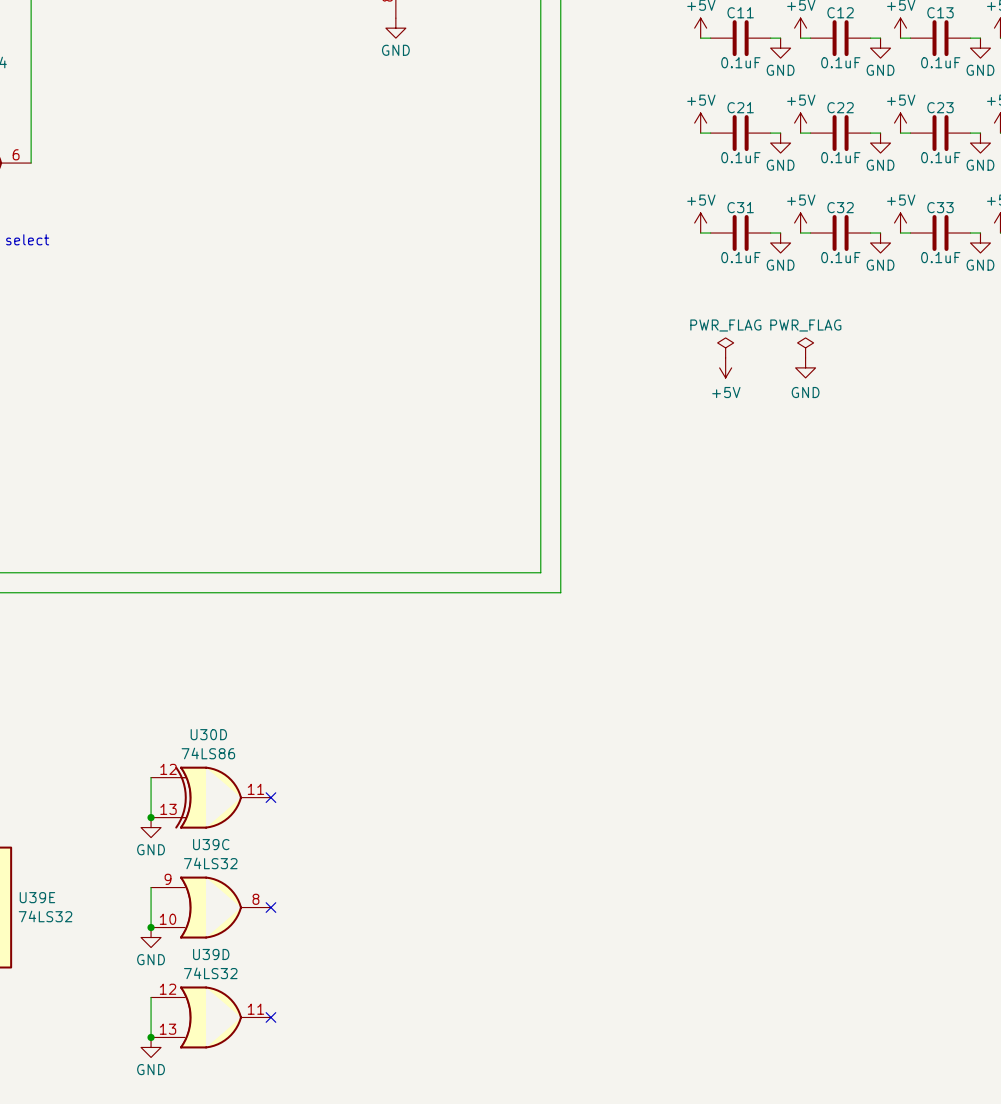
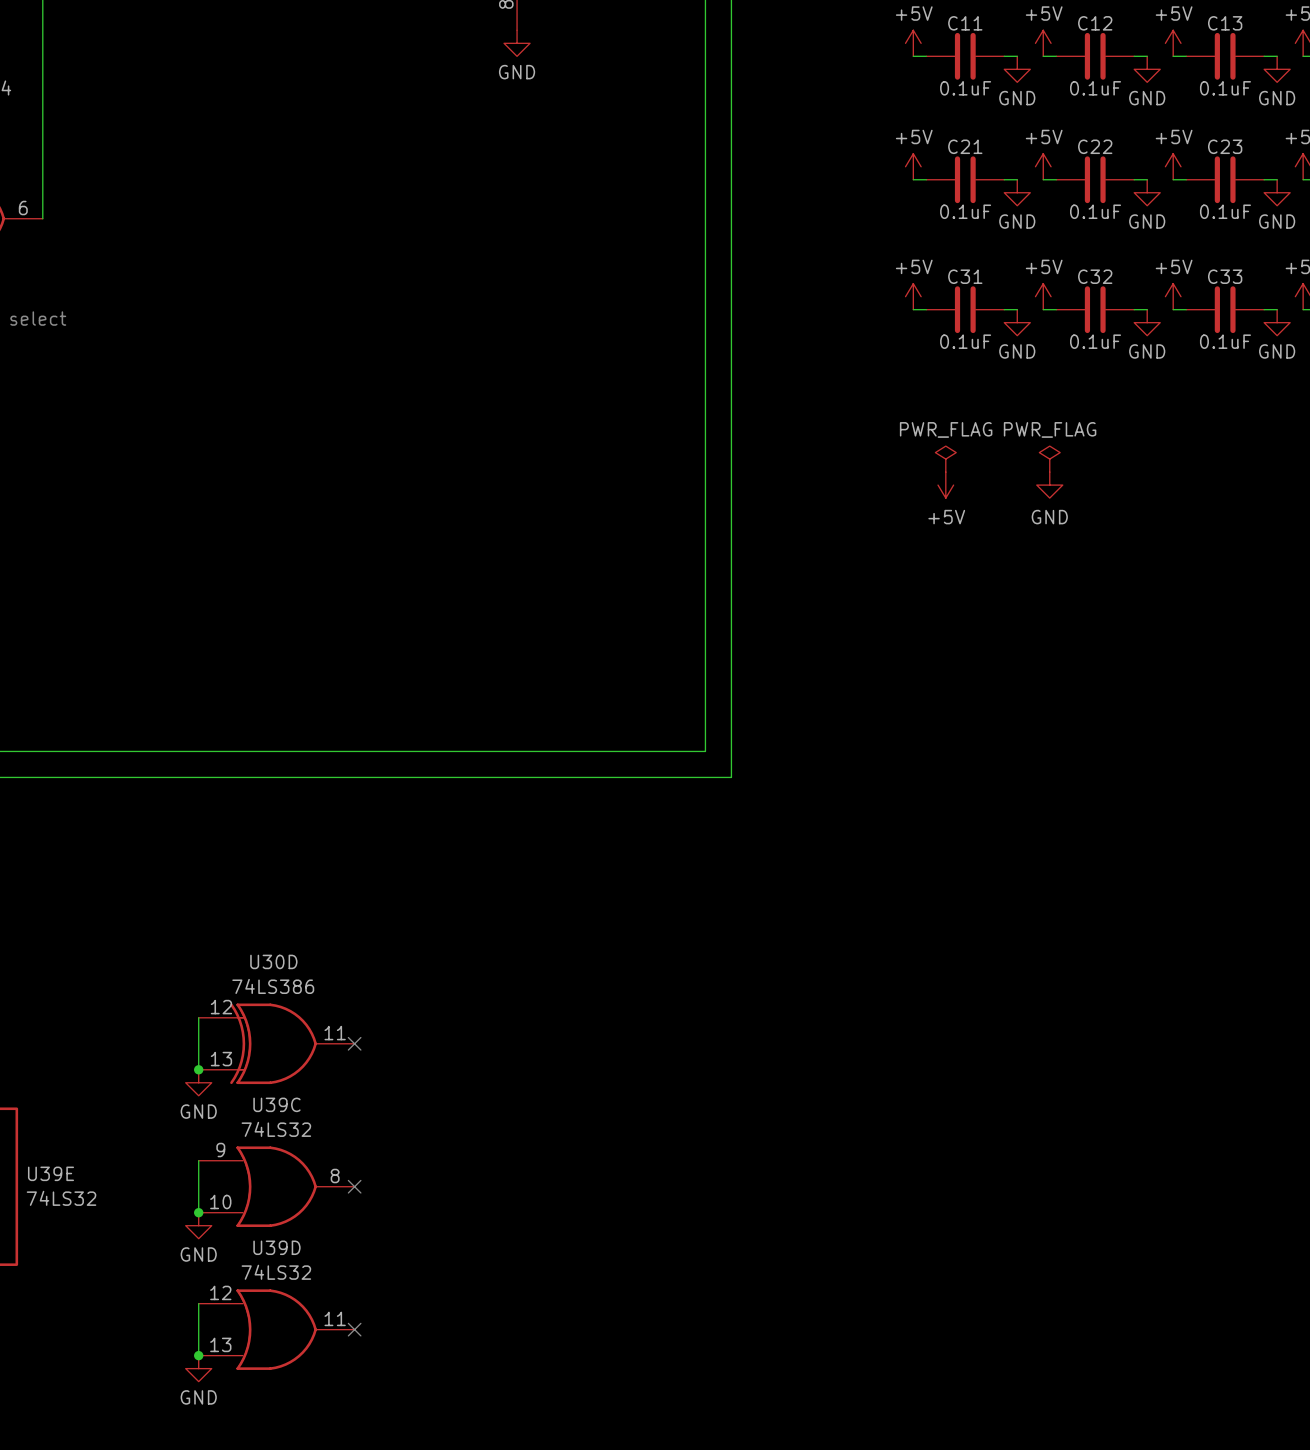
U30D value: 74LS86 (208, 753) -> 74LS386 (273, 986)

